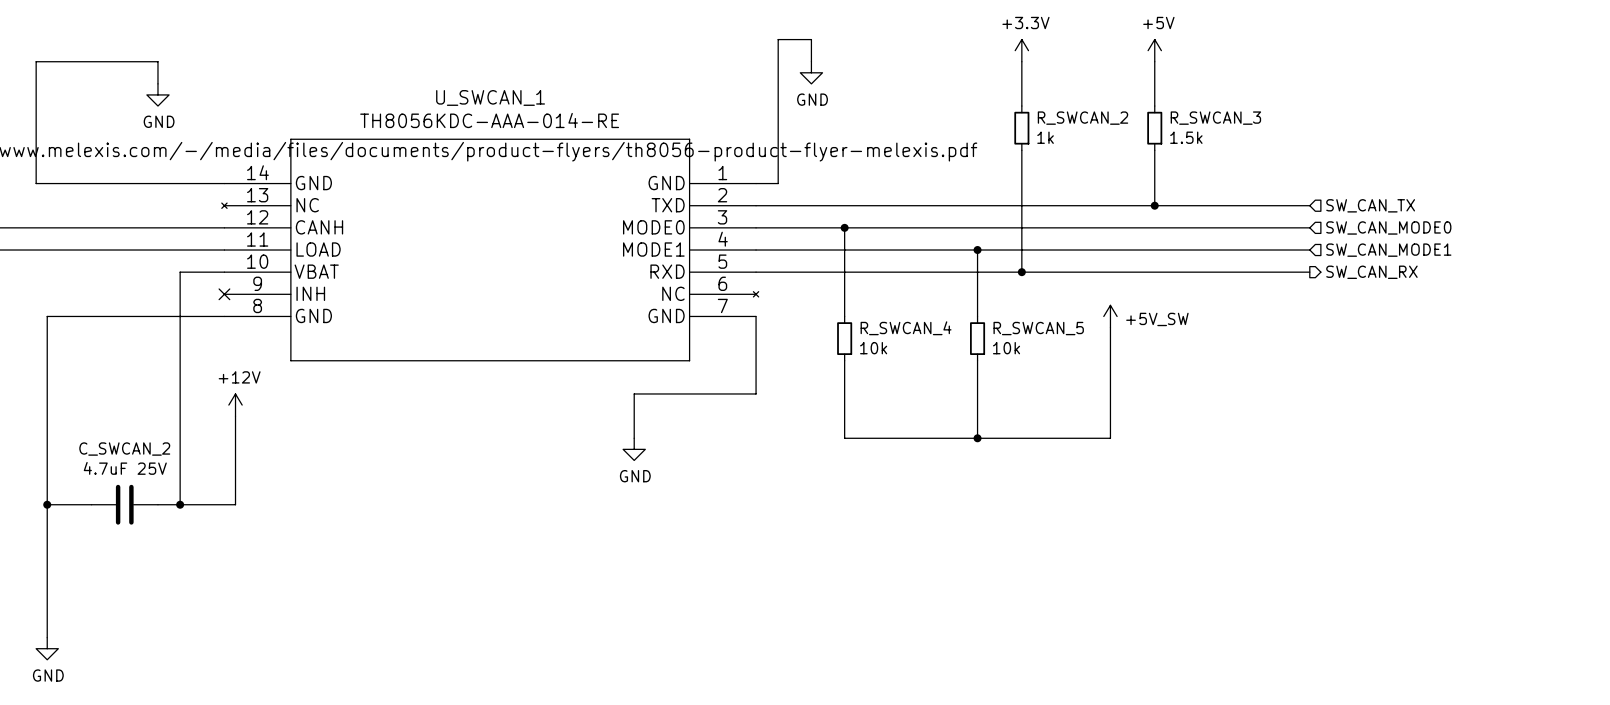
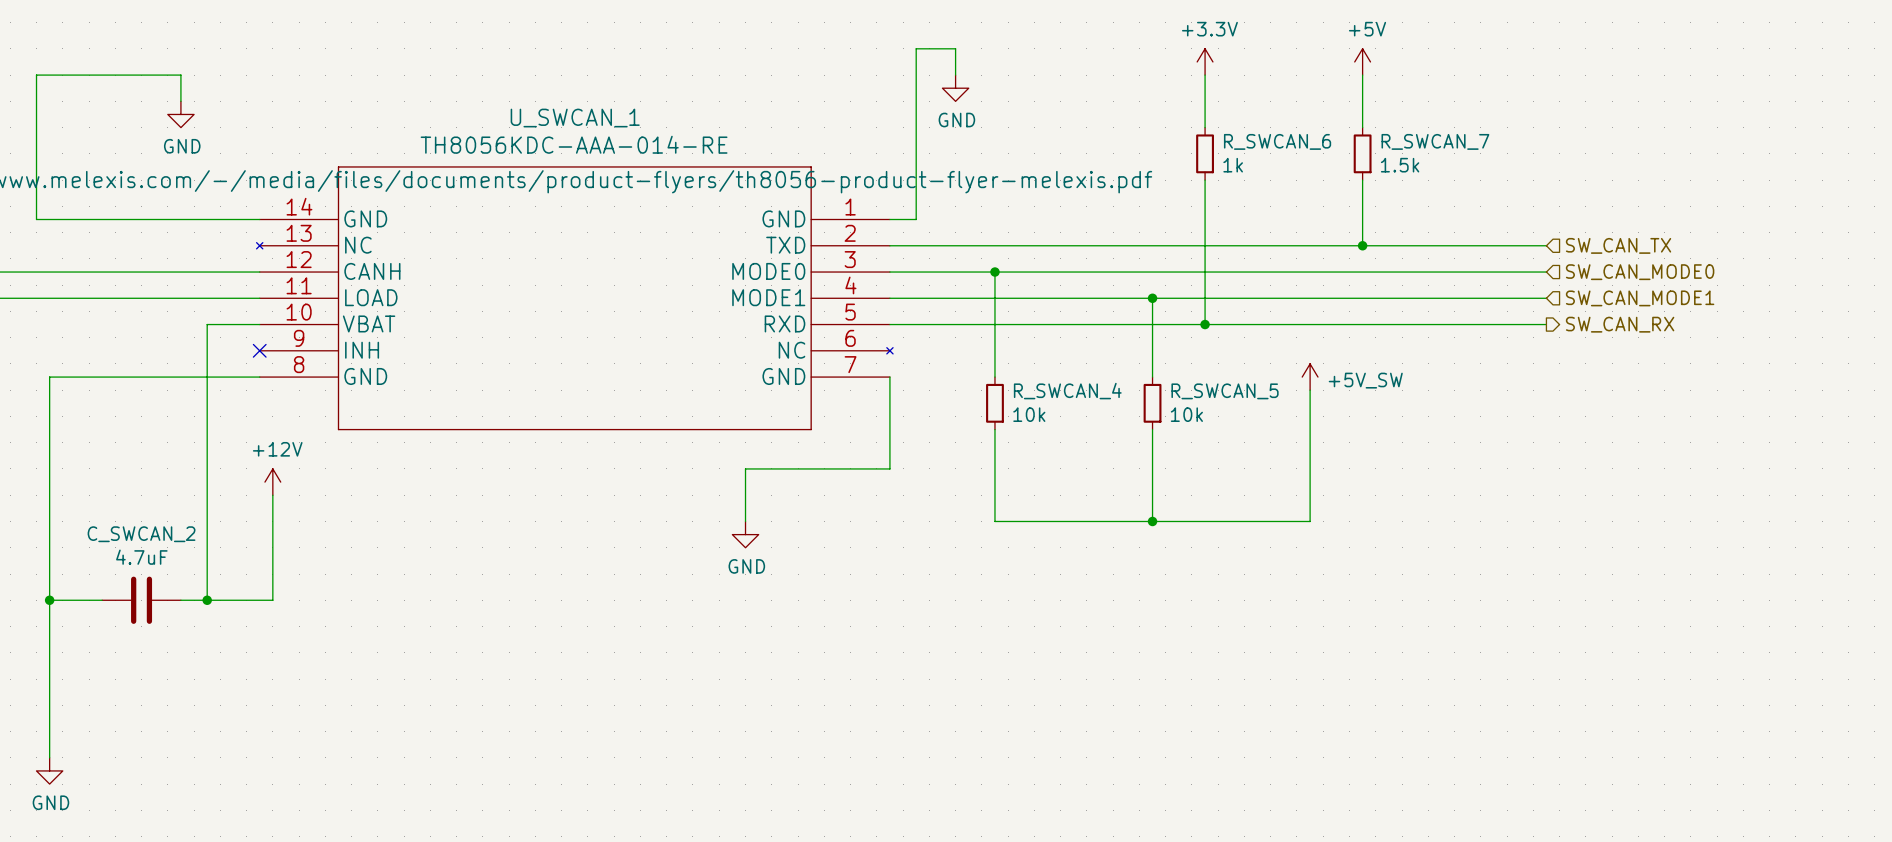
R_SWCAN_2 name: R_SWCAN_2 (1082, 118) -> R_SWCAN_6 (1277, 141)
R_SWCAN_3 name: R_SWCAN_3 (1215, 118) -> R_SWCAN_7 (1435, 141)
C_SWCAN_2 value: 4.7uF 25V (125, 468) -> 4.7uF (141, 557)

